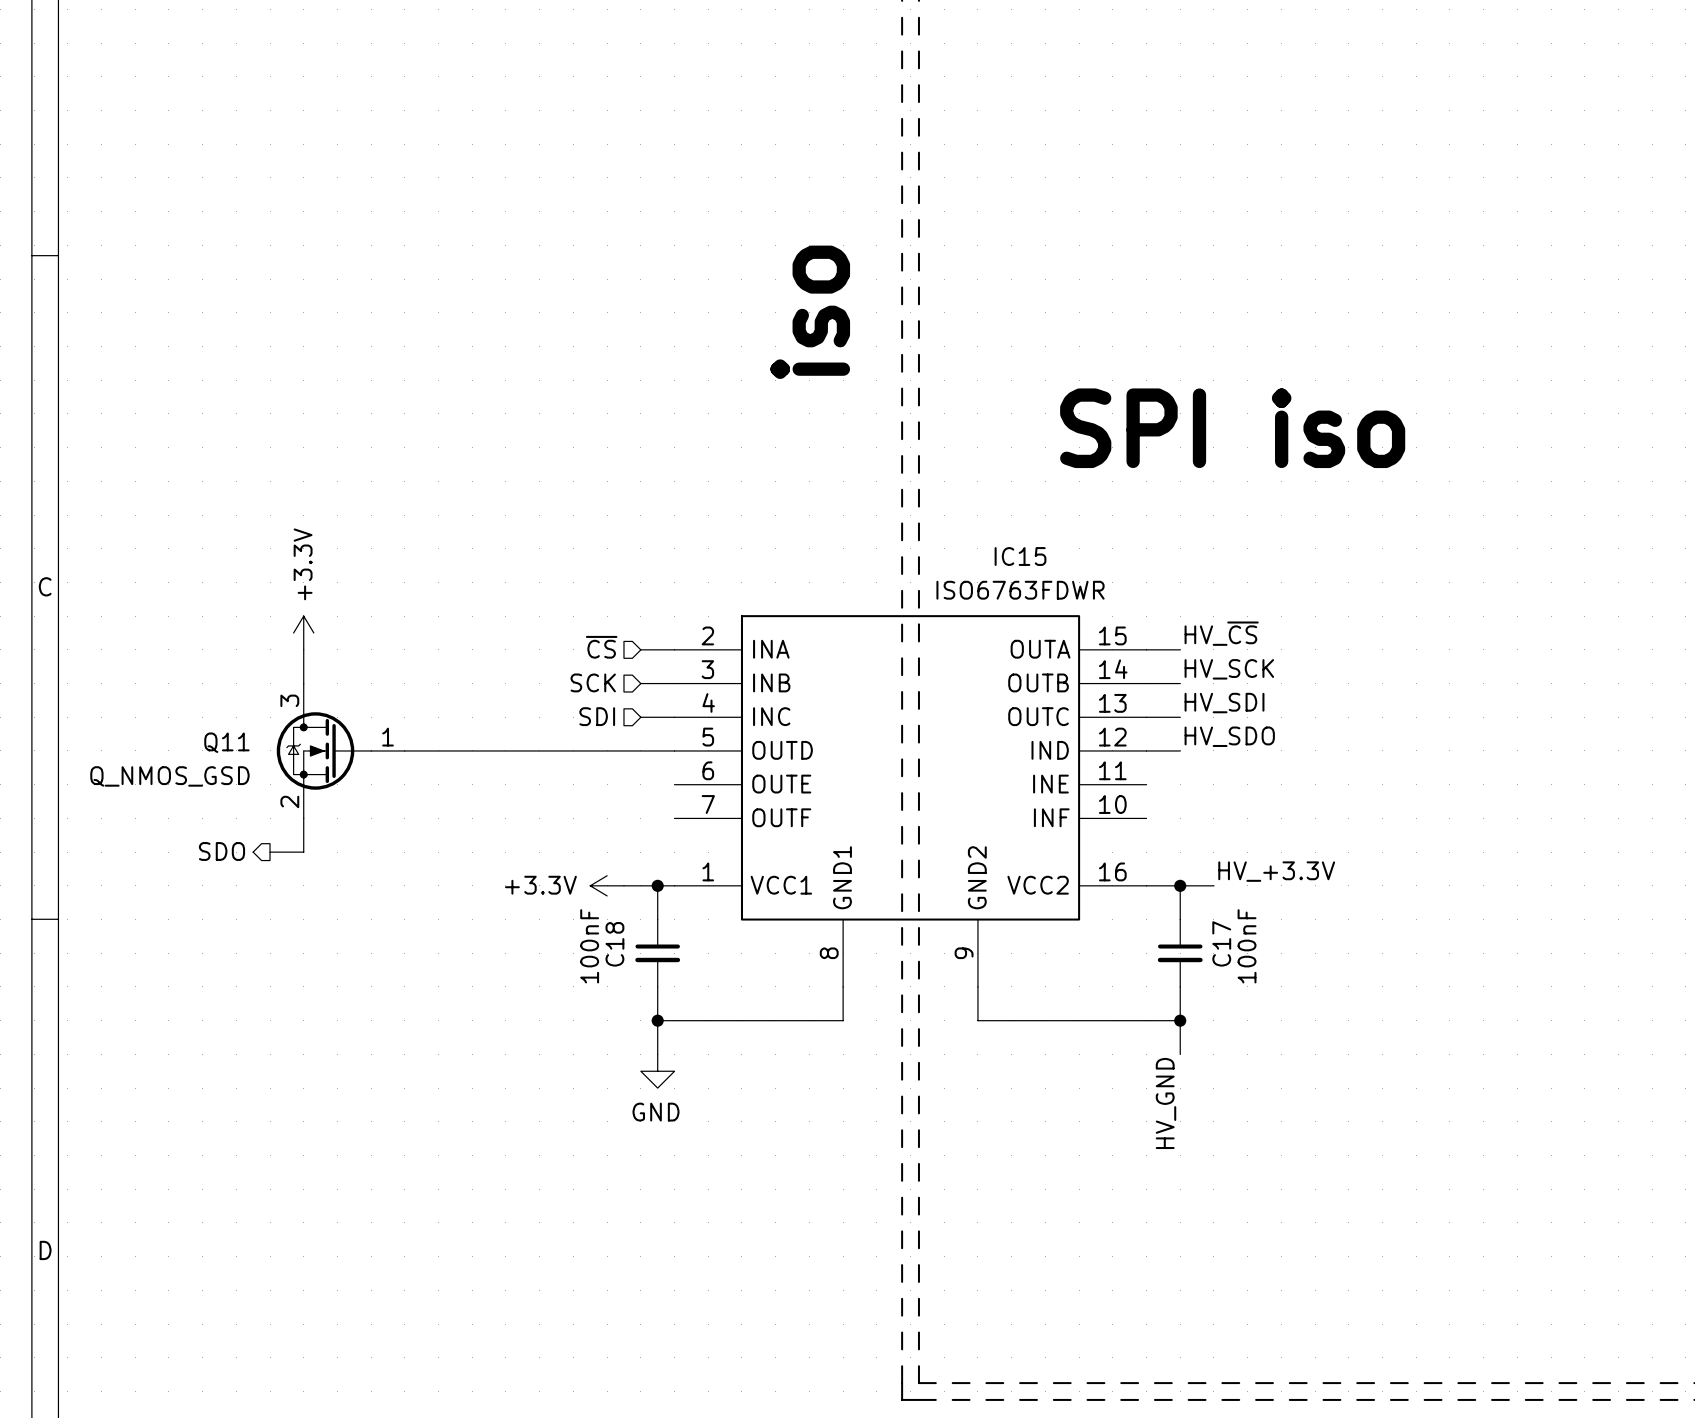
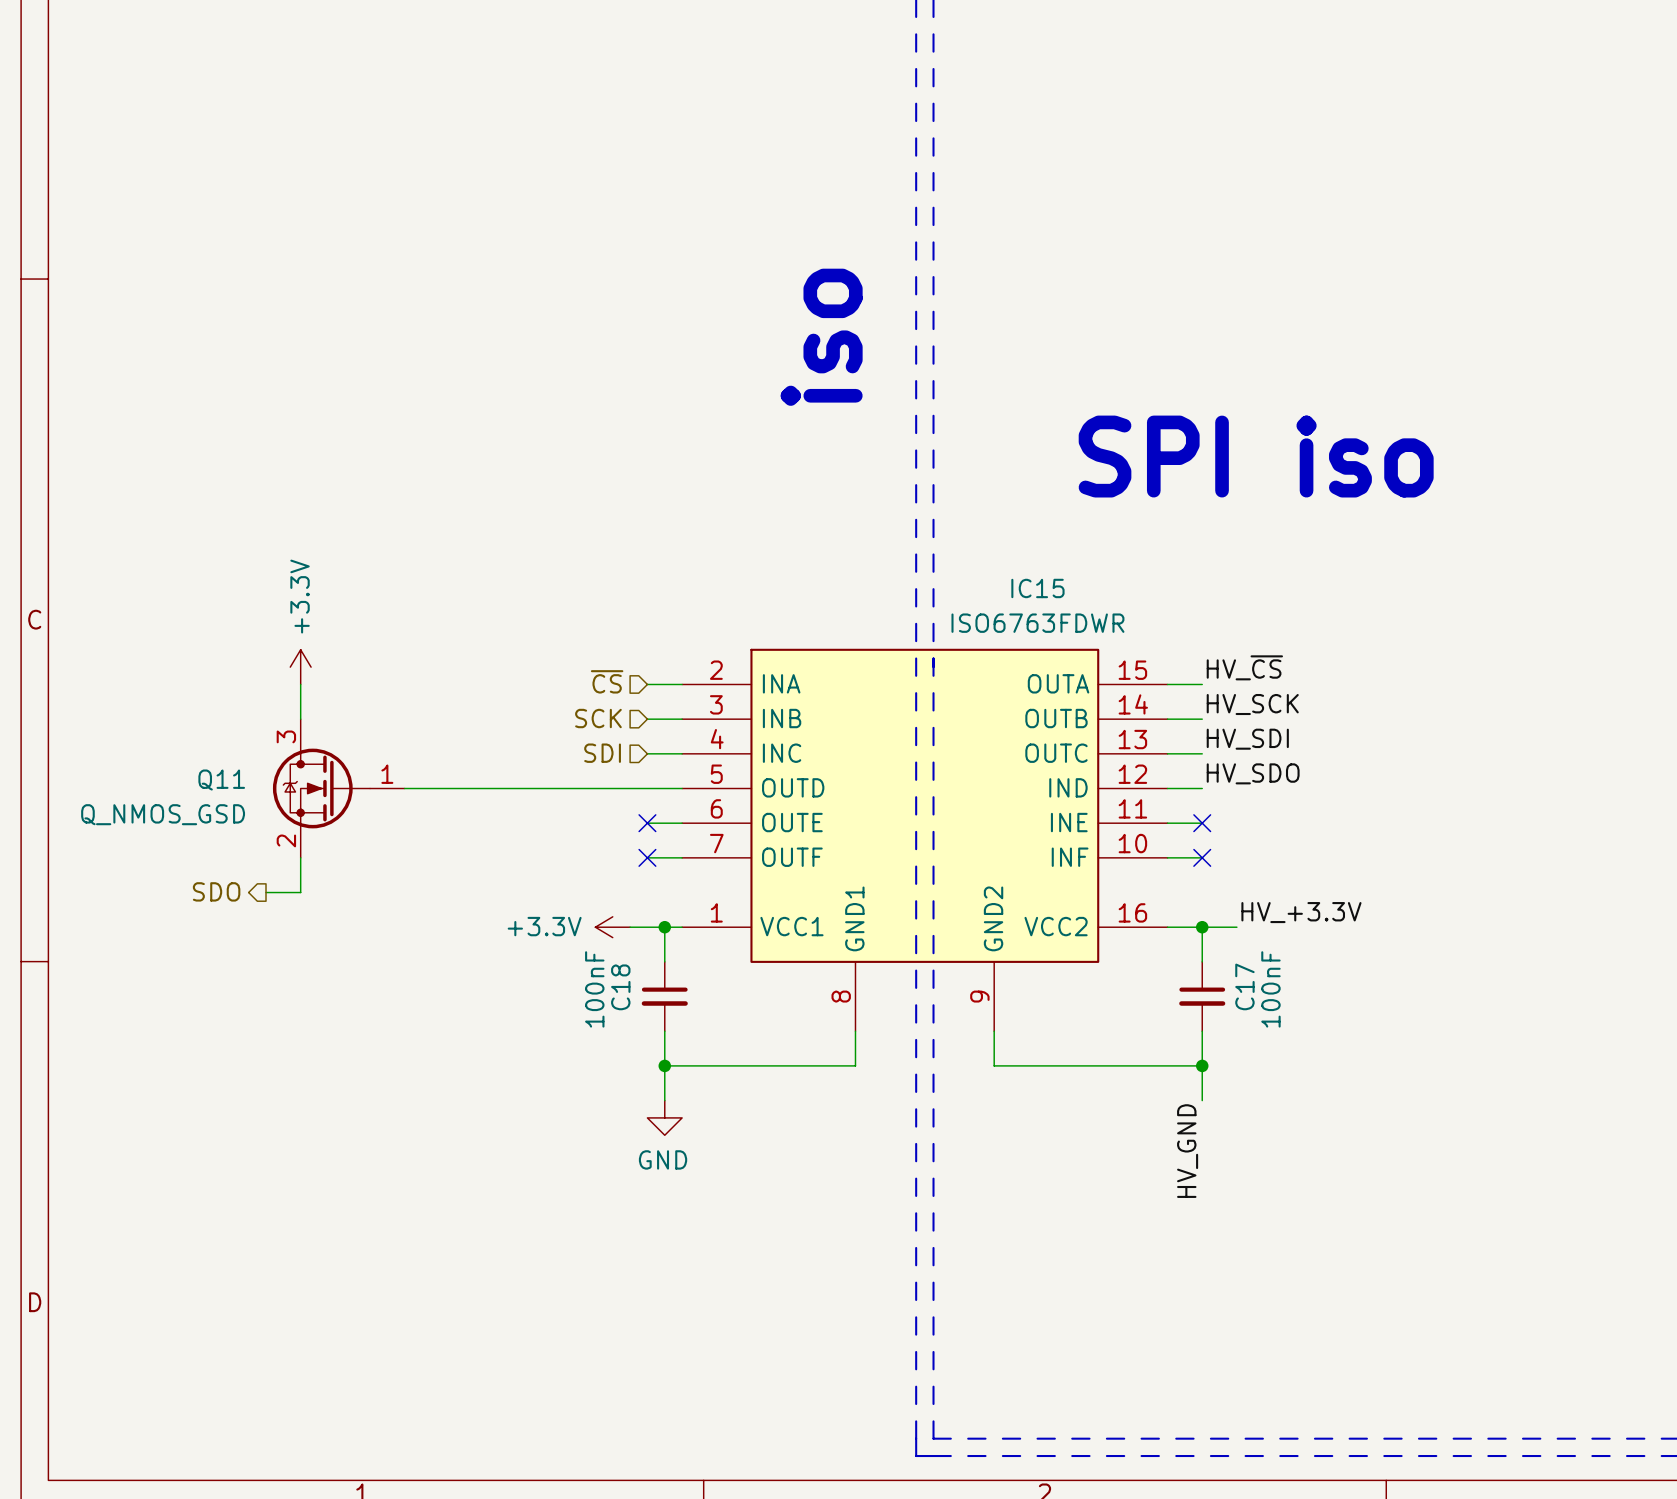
wire: none -> (647, 823) (682, 823)
no-connect mark: none -> (647, 823)
wire: none -> (1167, 823) (1202, 823)
no-connect mark: none -> (1202, 823)
wire: none -> (647, 857) (682, 857)
no-connect mark: none -> (647, 857)
wire: none -> (1167, 857) (1202, 857)
no-connect mark: none -> (1202, 857)

